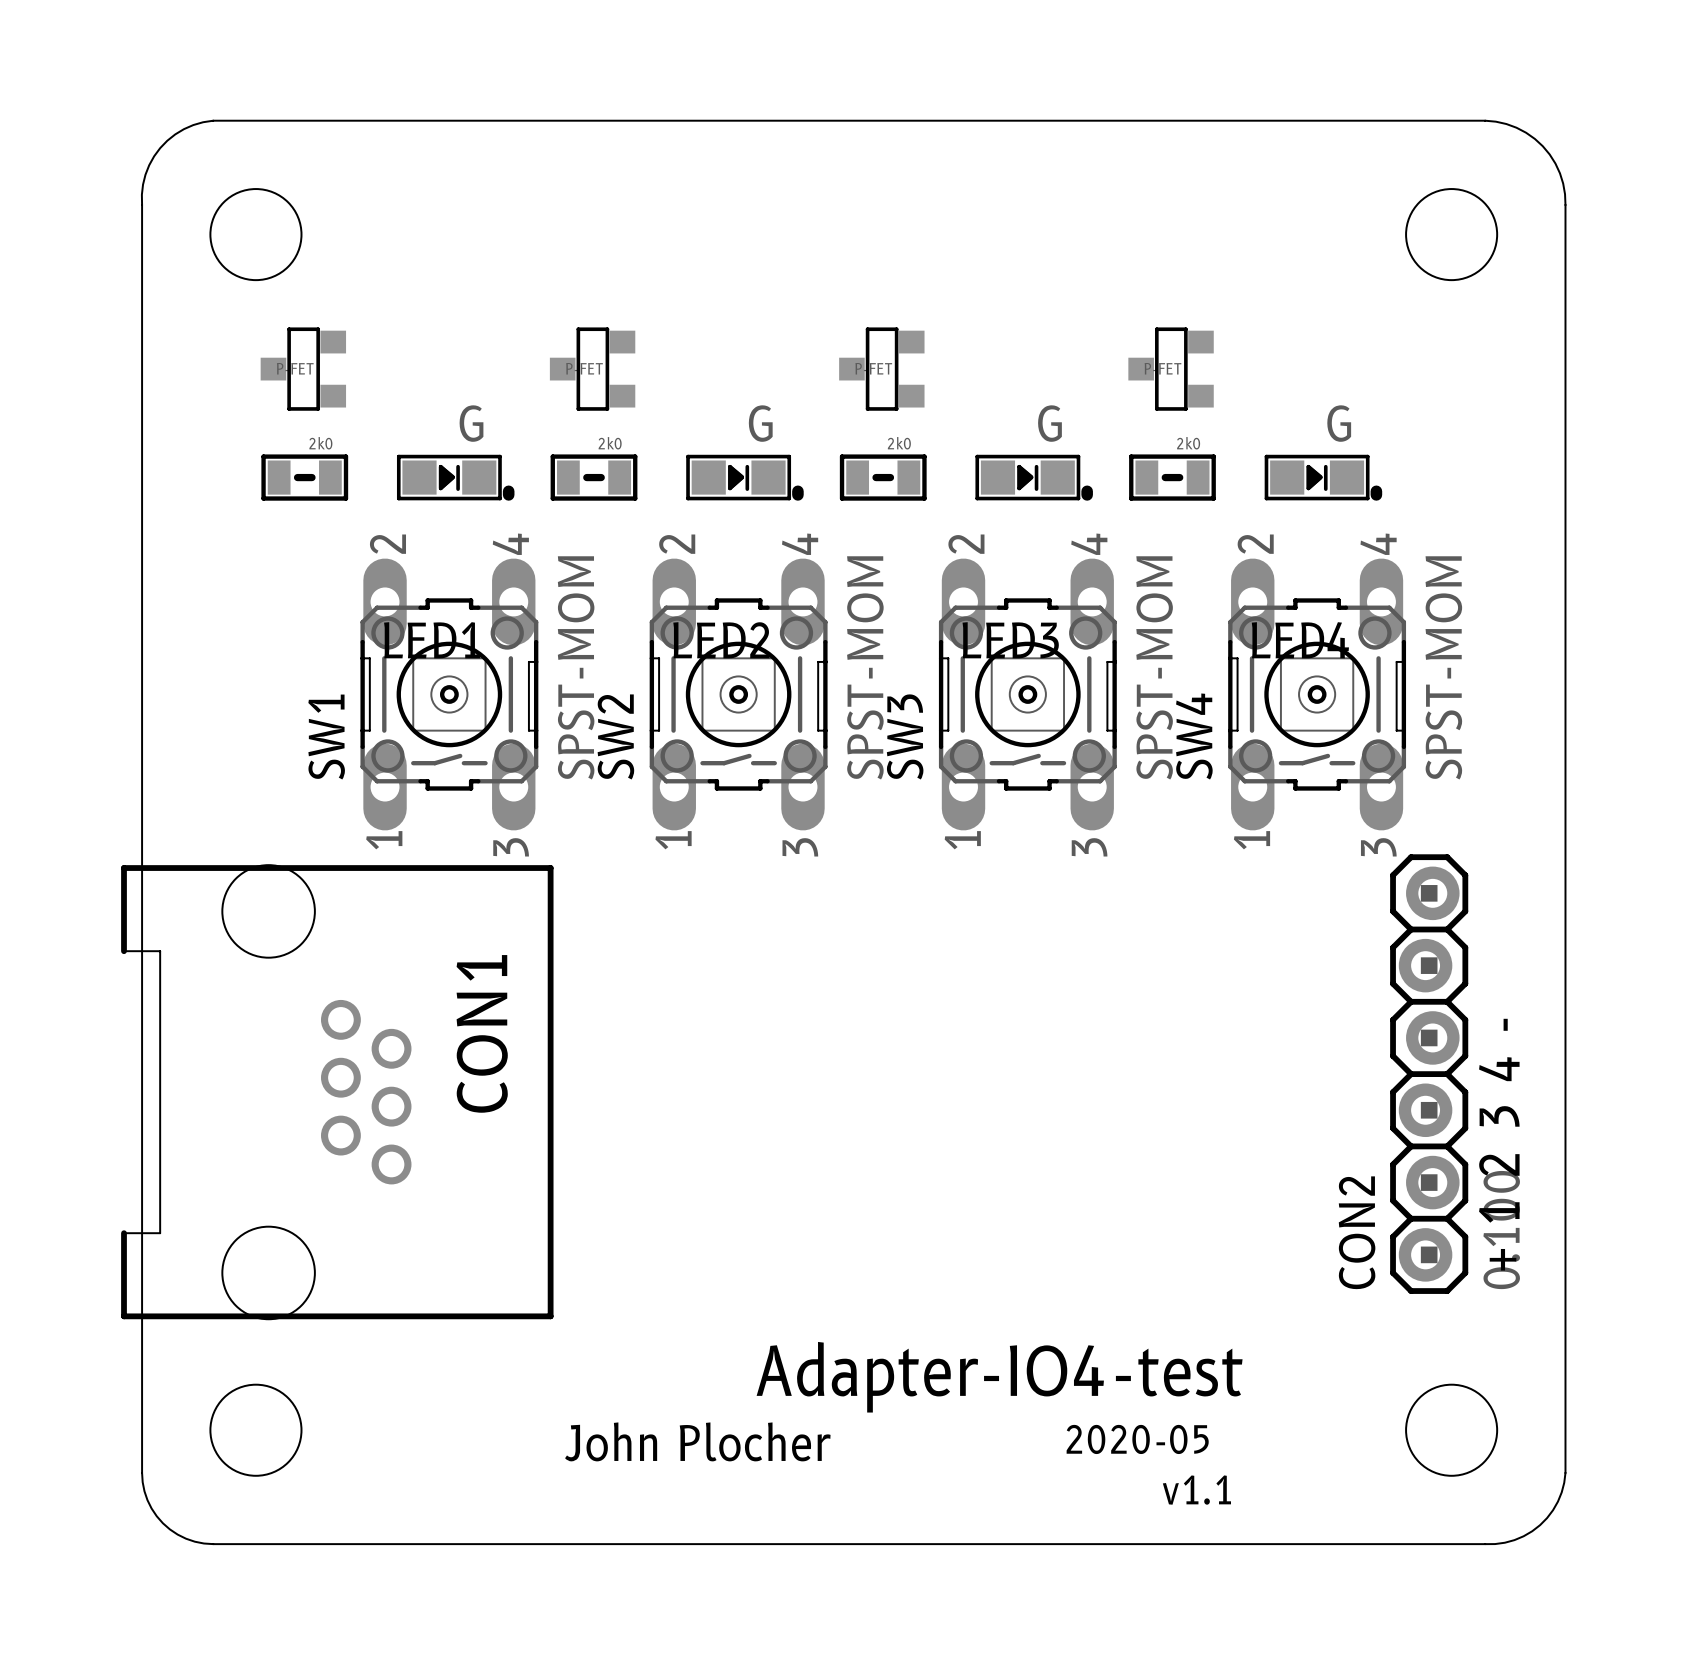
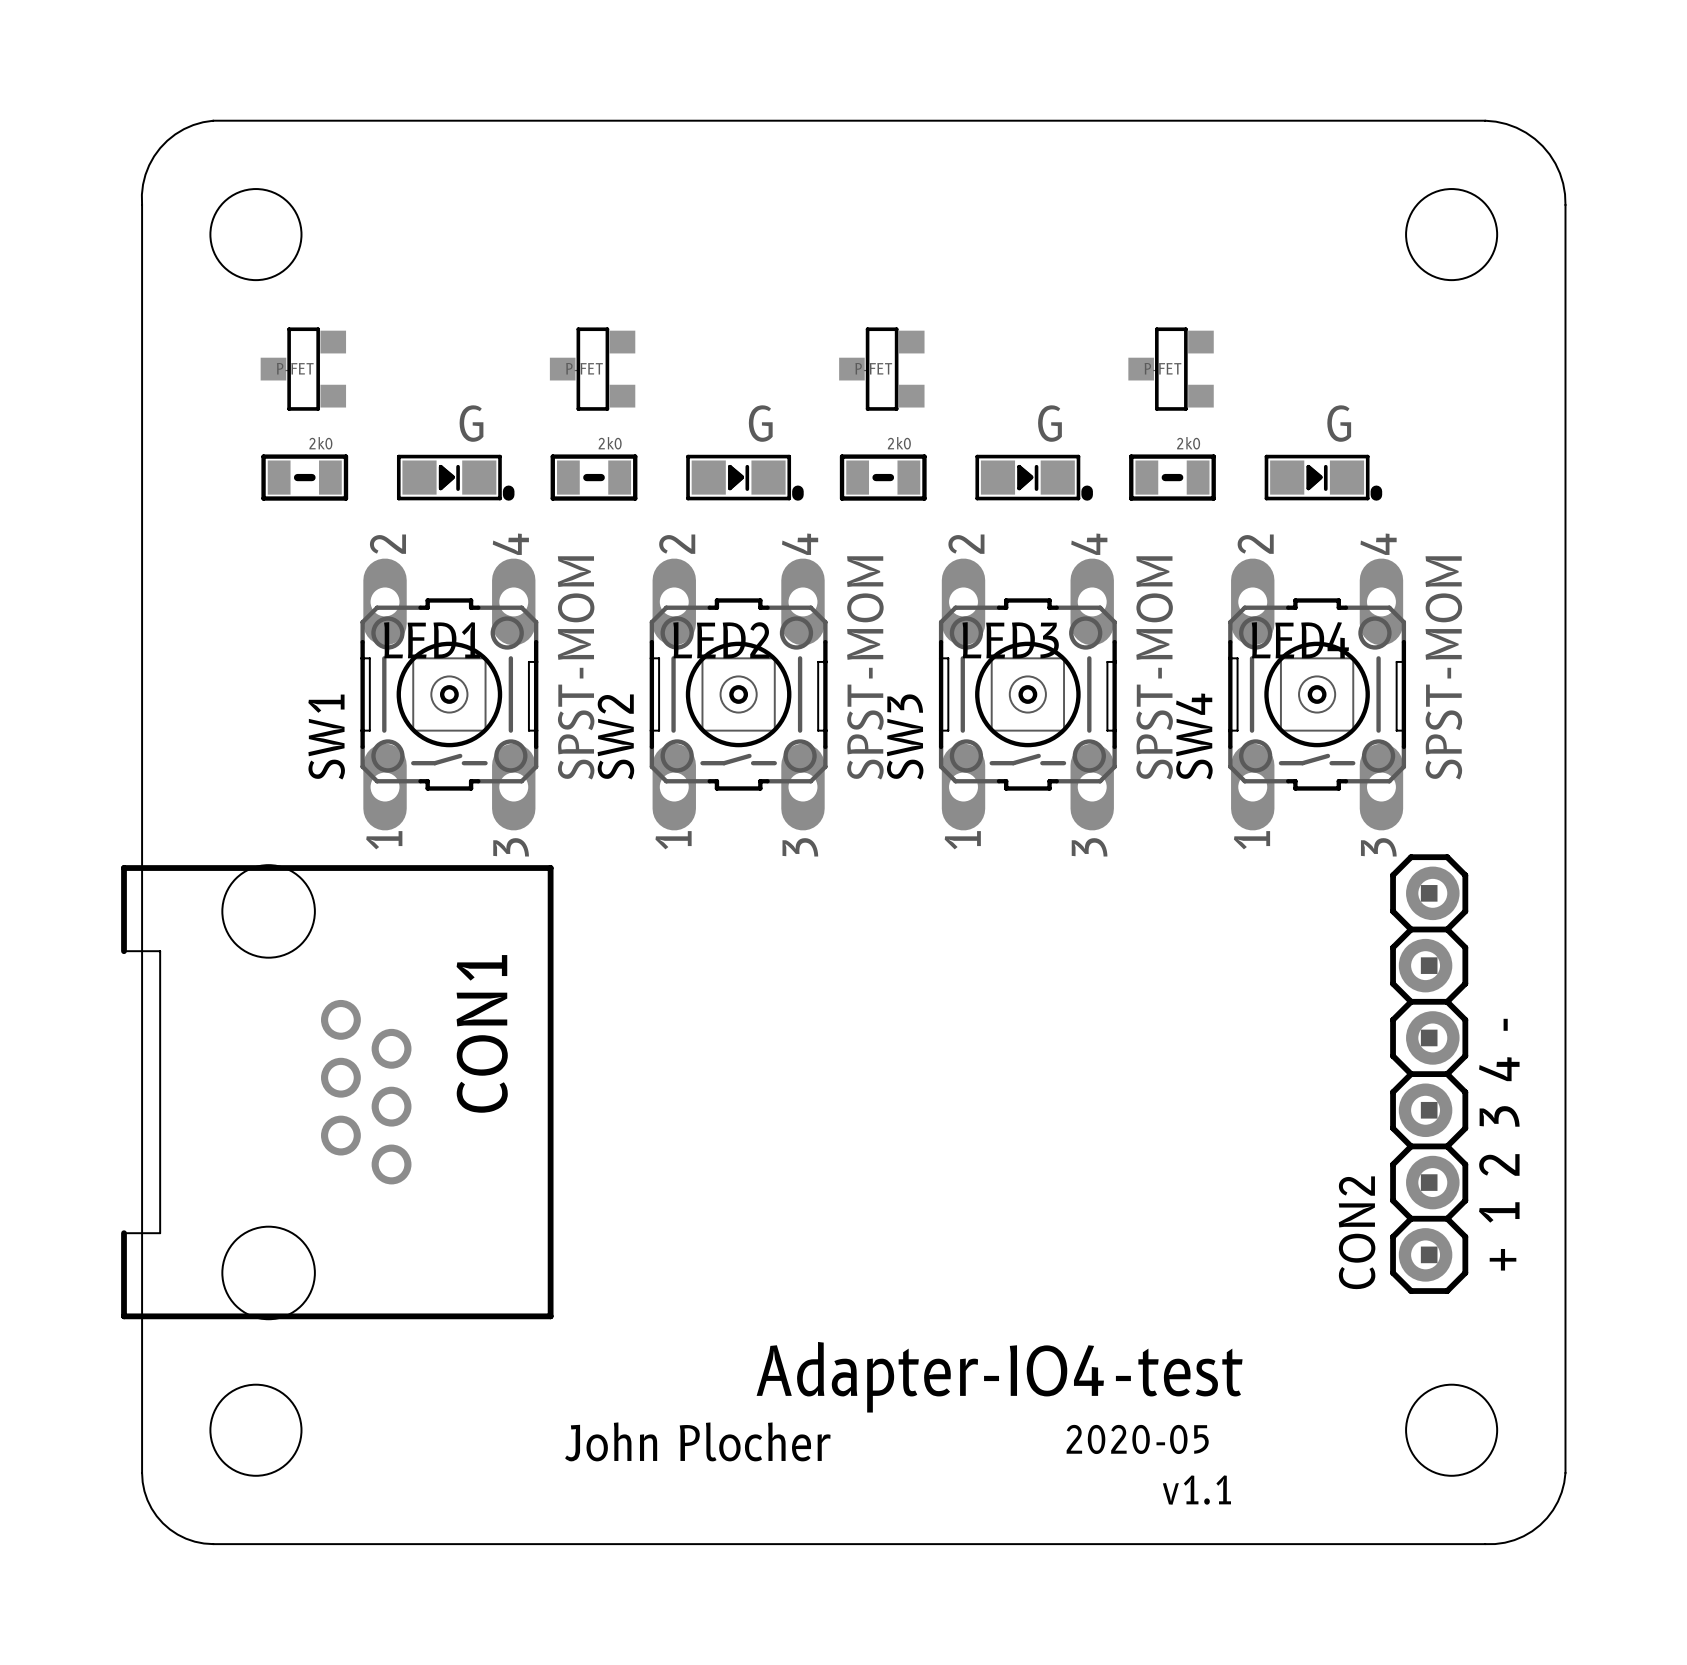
CON2 value: 0.100 (1501, 1230) -> none

